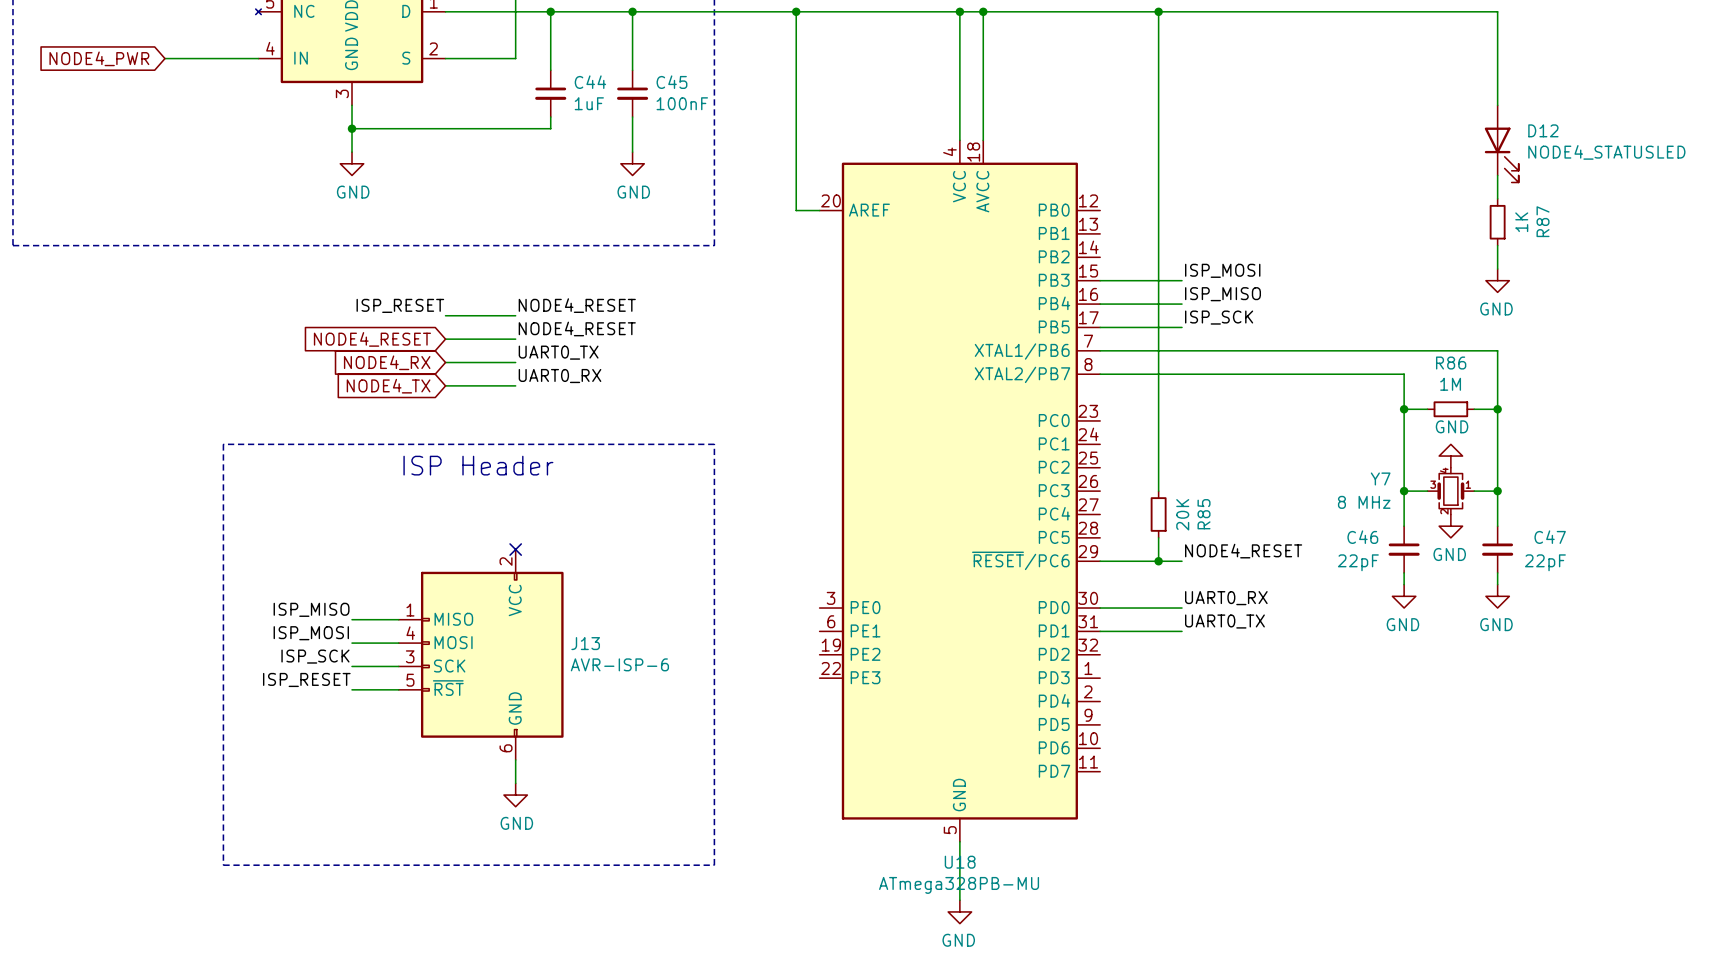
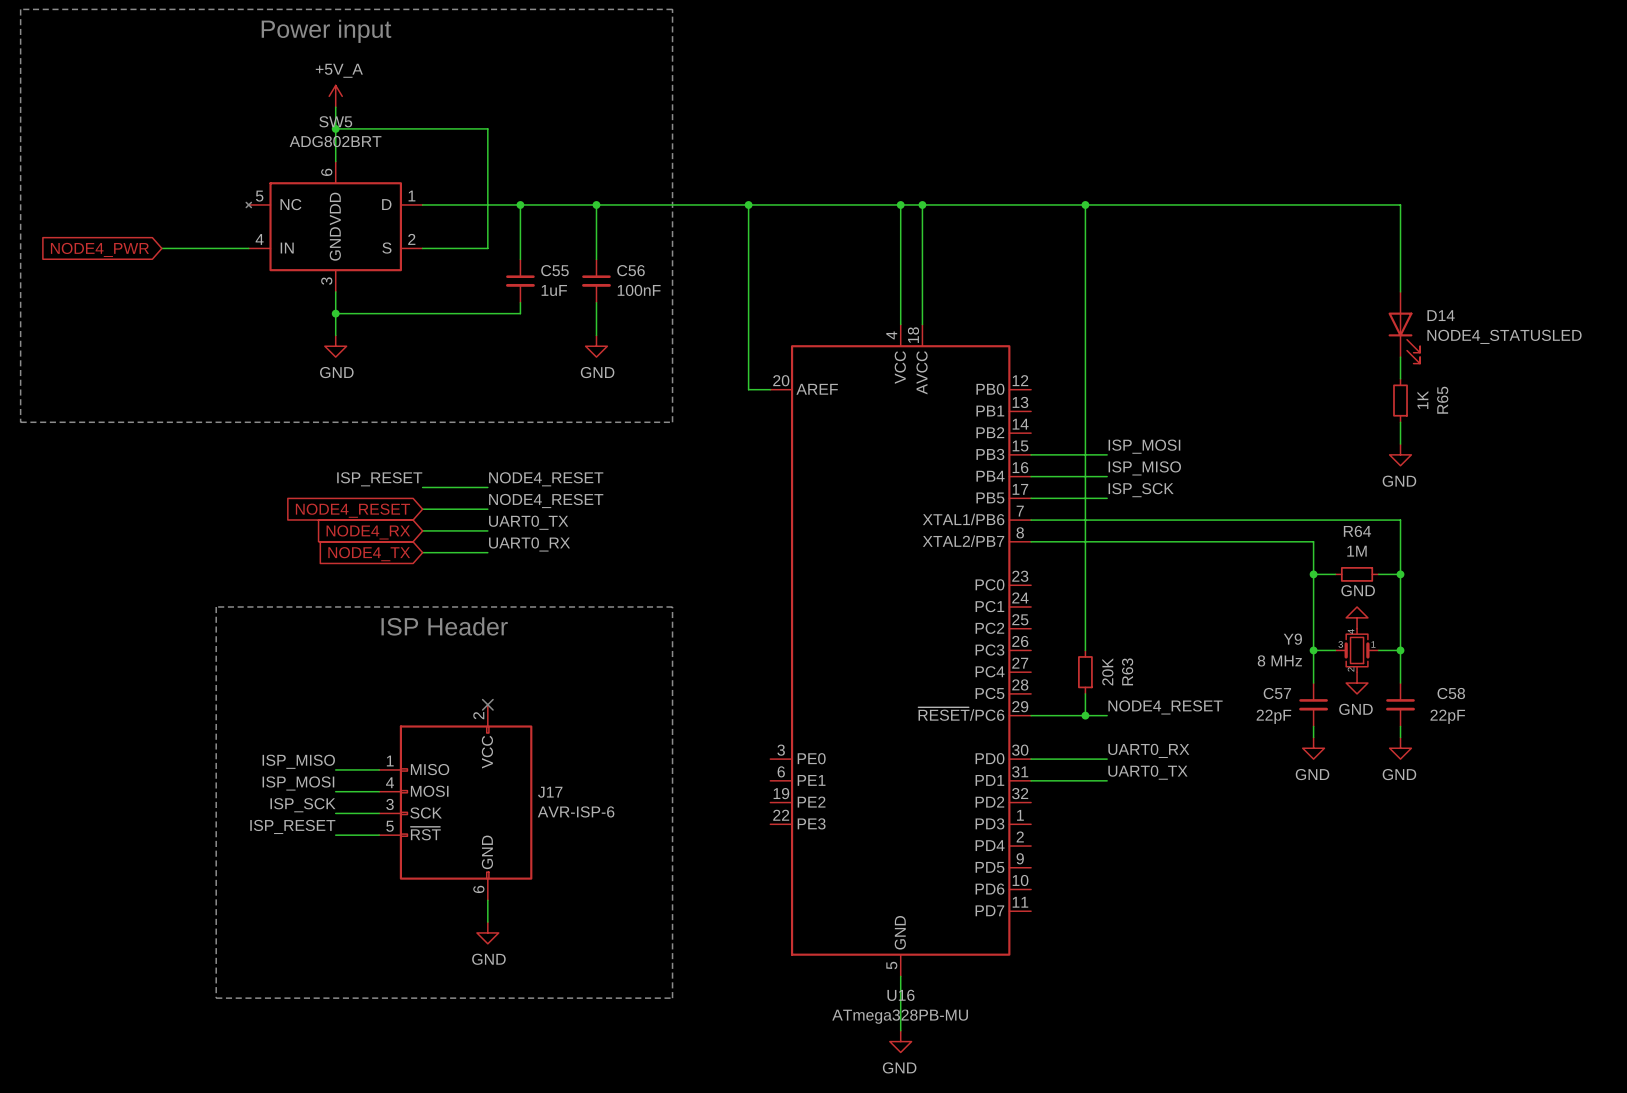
C44 name: C44 (590, 82) -> C55 (554, 270)
C45 name: C45 (671, 82) -> C56 (631, 270)
D12 name: D12 (1543, 130) -> D14 (1441, 315)
R87 name: R87 (1543, 221) -> R65 (1442, 400)
R86 name: R86 (1451, 363) -> R64 (1357, 531)
Y7 name: Y7 (1380, 478) -> Y9 (1292, 639)
R85 name: R85 (1204, 514) -> R63 (1127, 671)
C46 name: C46 (1362, 537) -> C57 (1277, 693)
C47 name: C47 (1550, 537) -> C58 (1451, 693)
J13 name: J13 (585, 643) -> J17 (550, 792)
U18 name: U18 (960, 862) -> U16 (900, 995)

